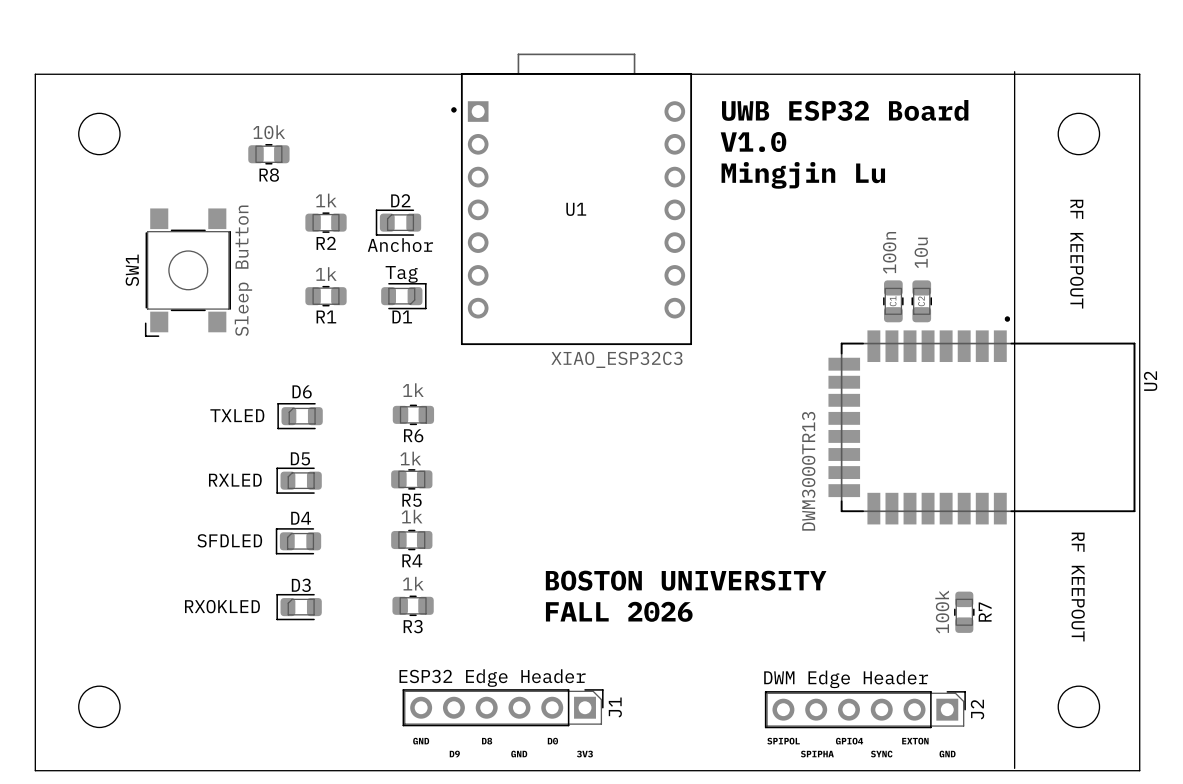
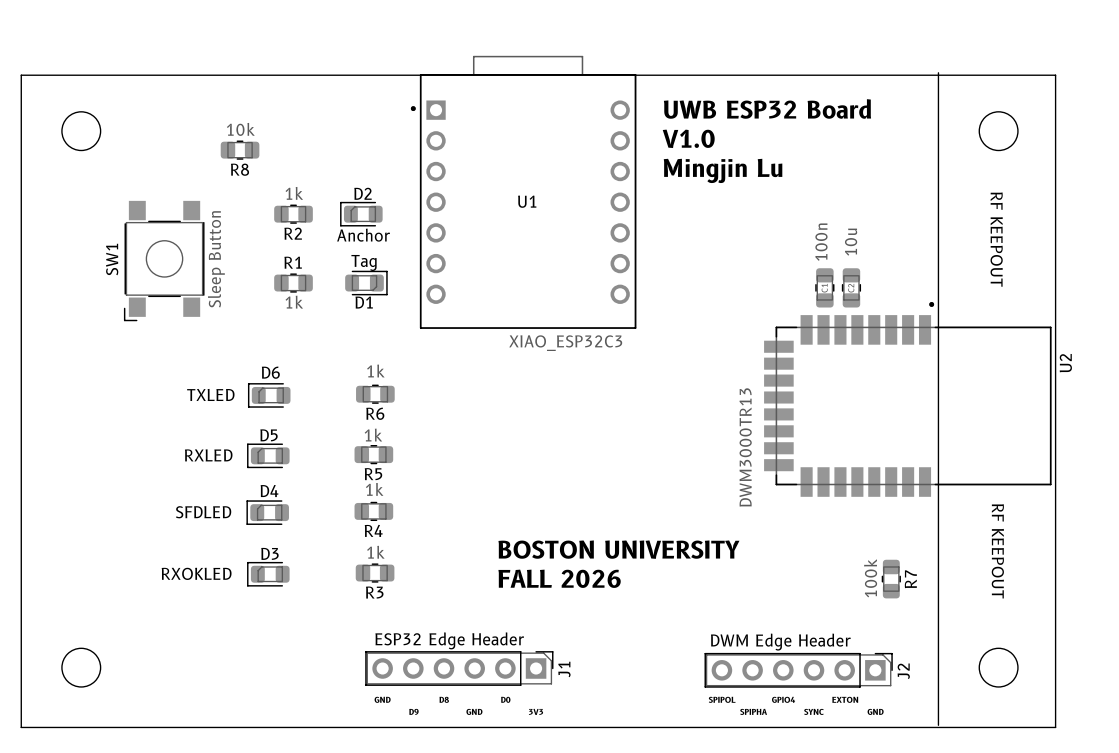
R1 value position: 1k (326, 274) -> 1k (294, 302)
R1 name position: R1 (326, 316) -> R1 (293, 262)

